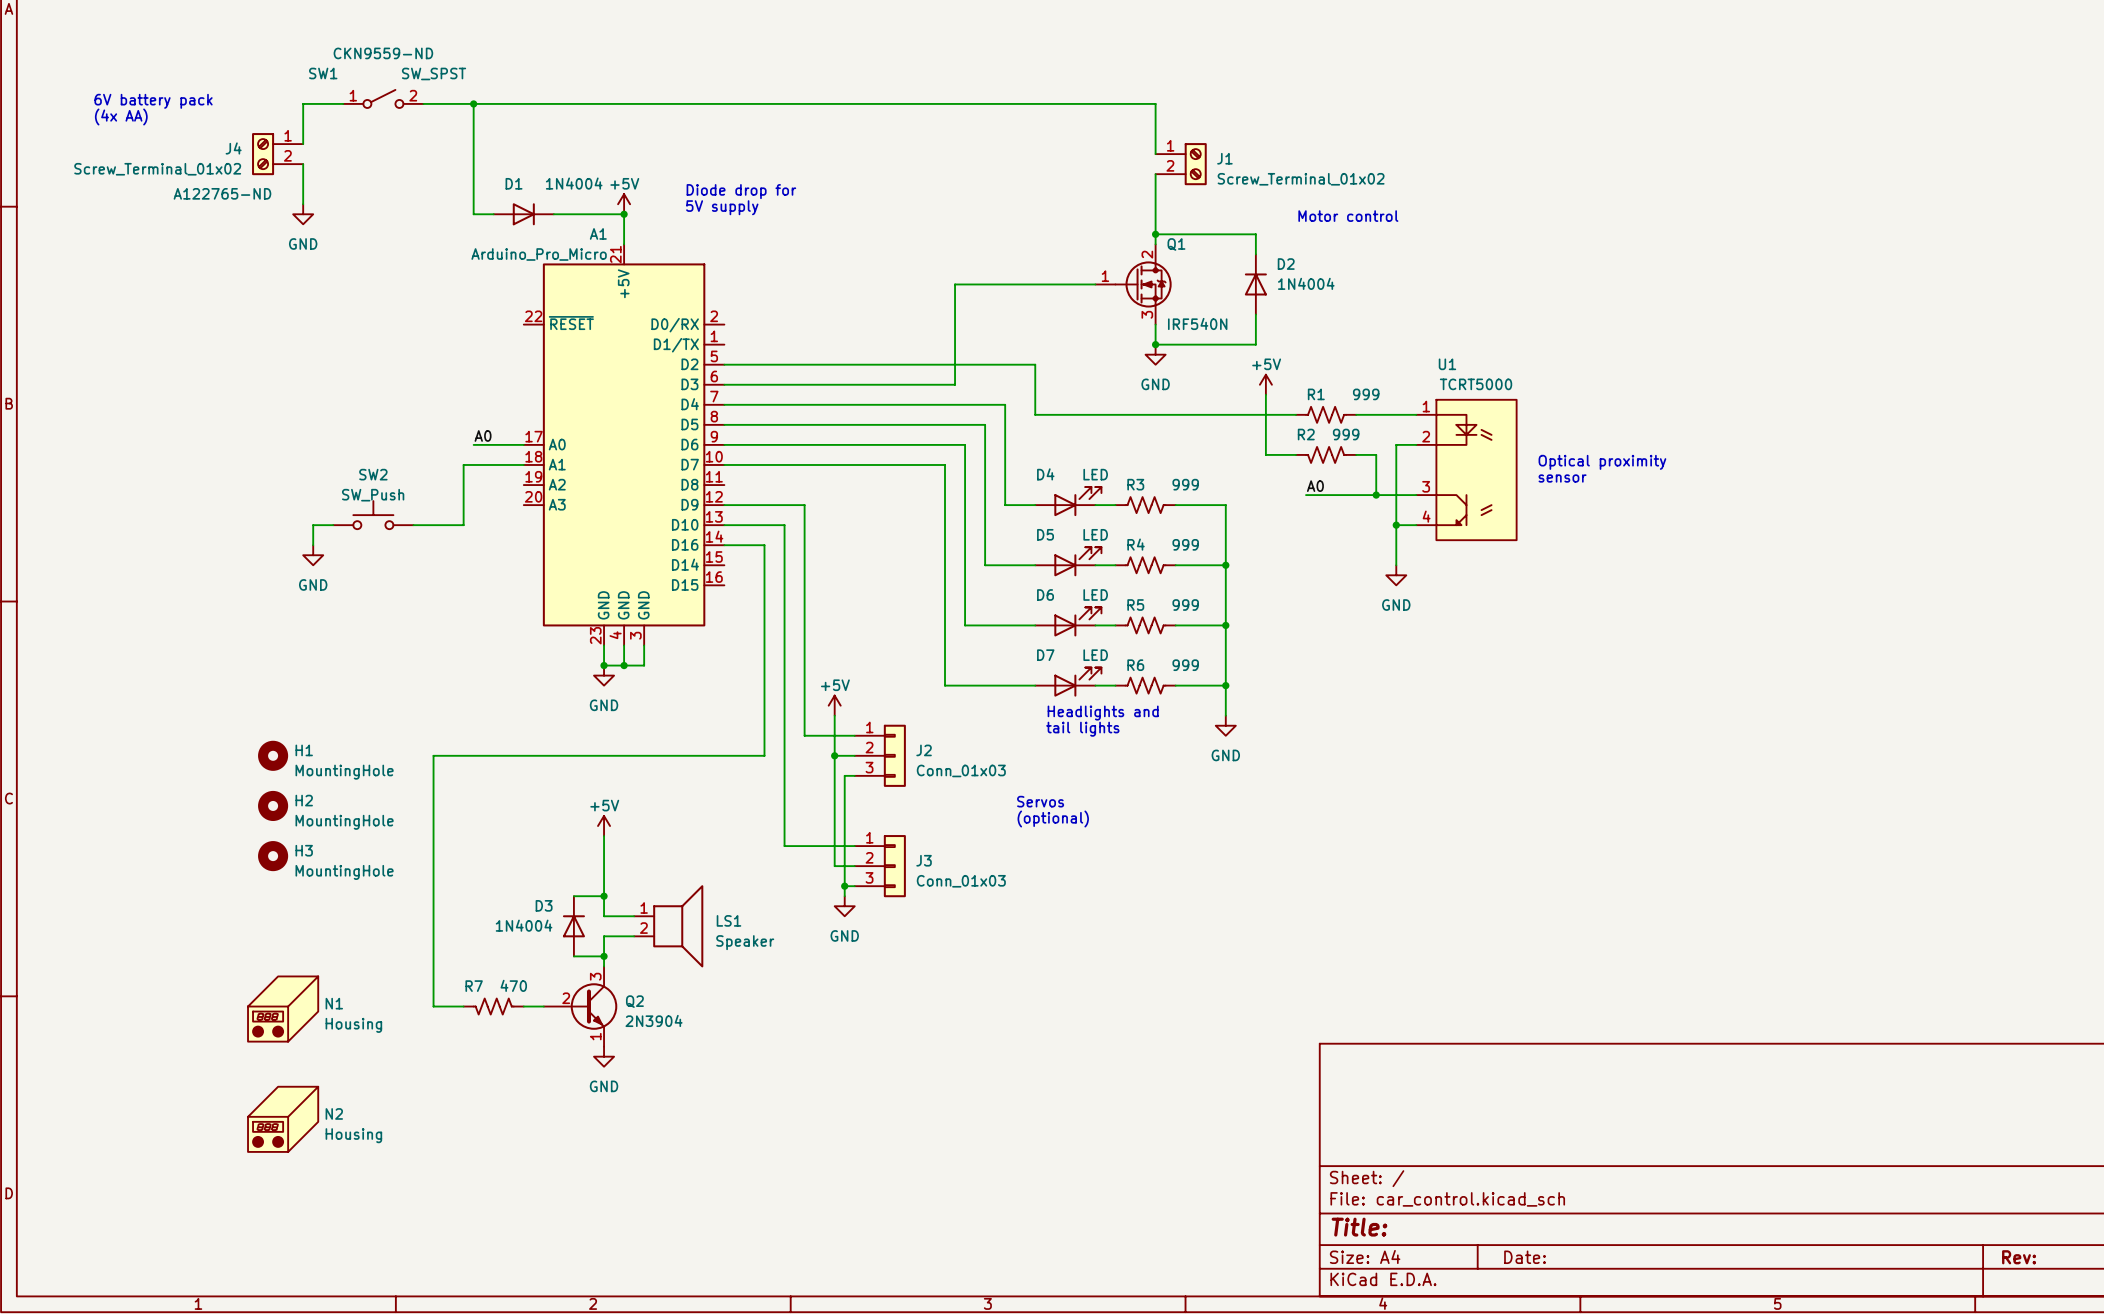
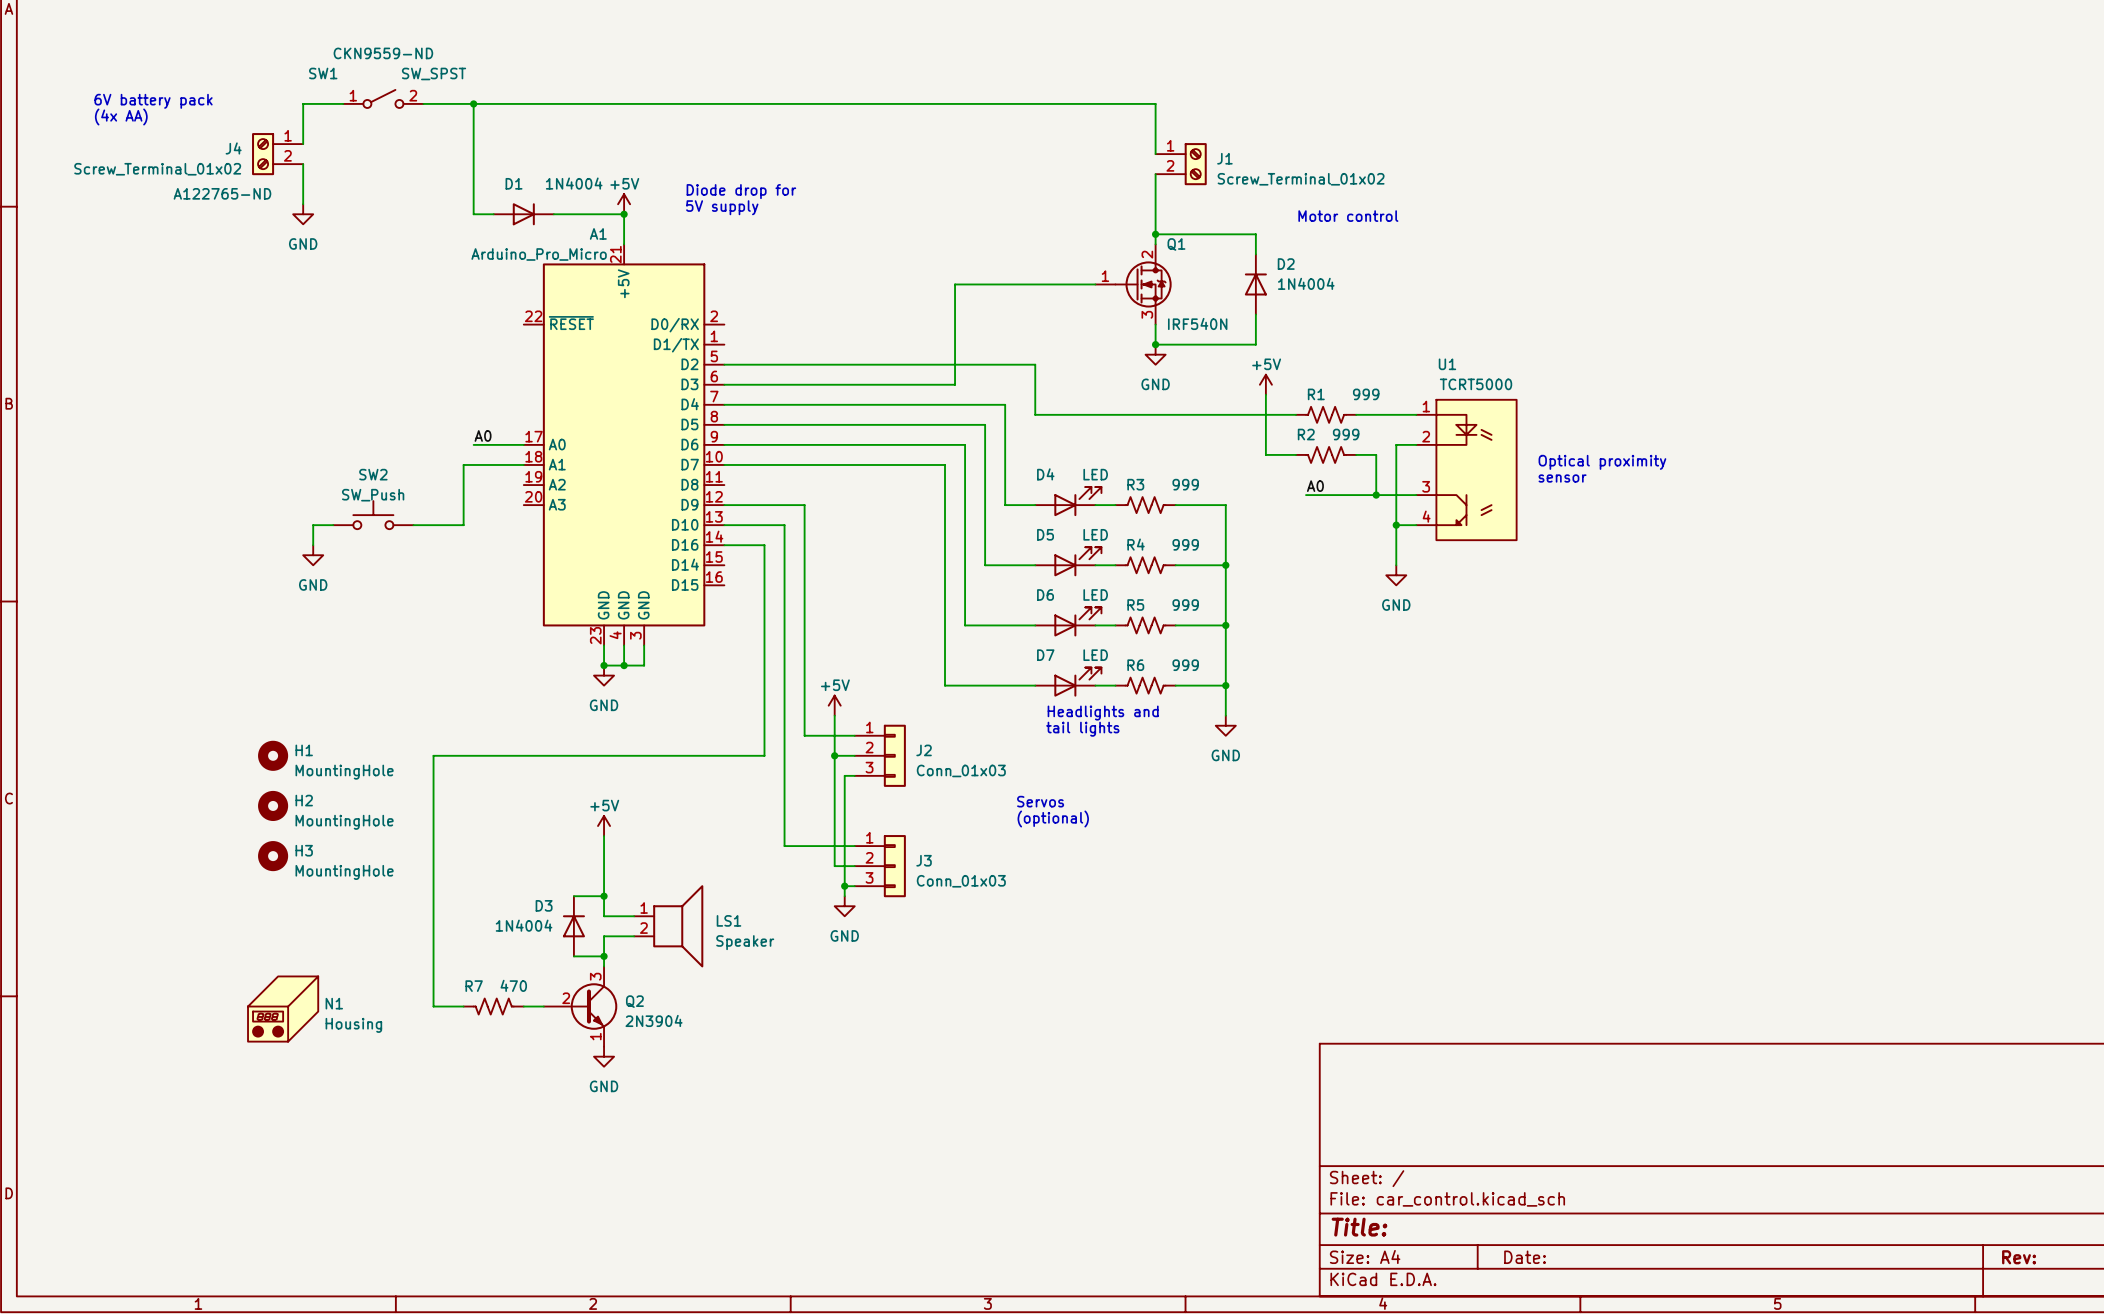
N2: Housing (283, 1119) -> none

